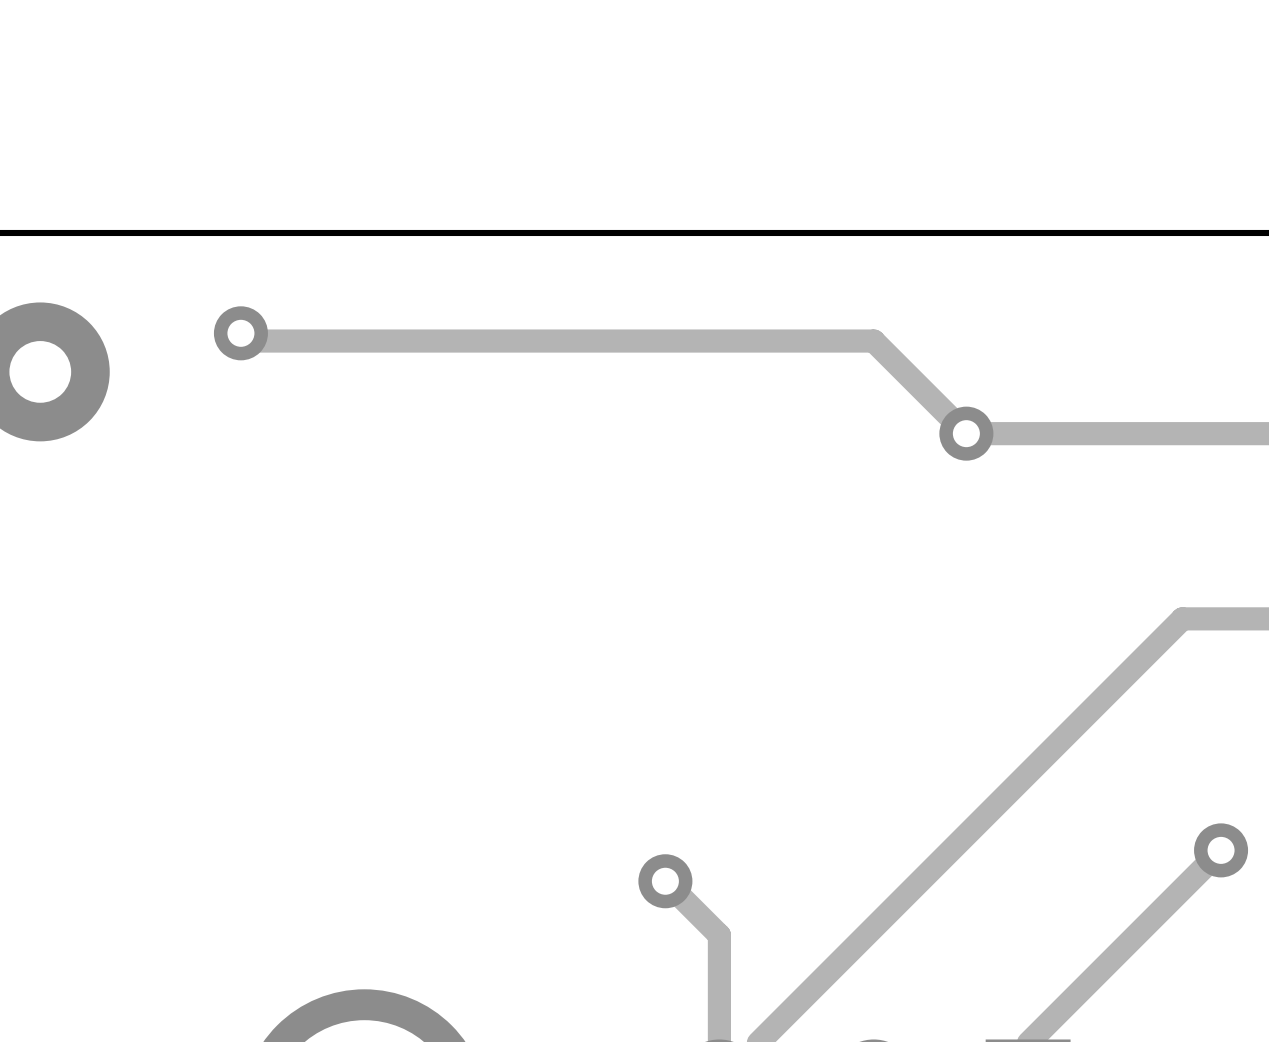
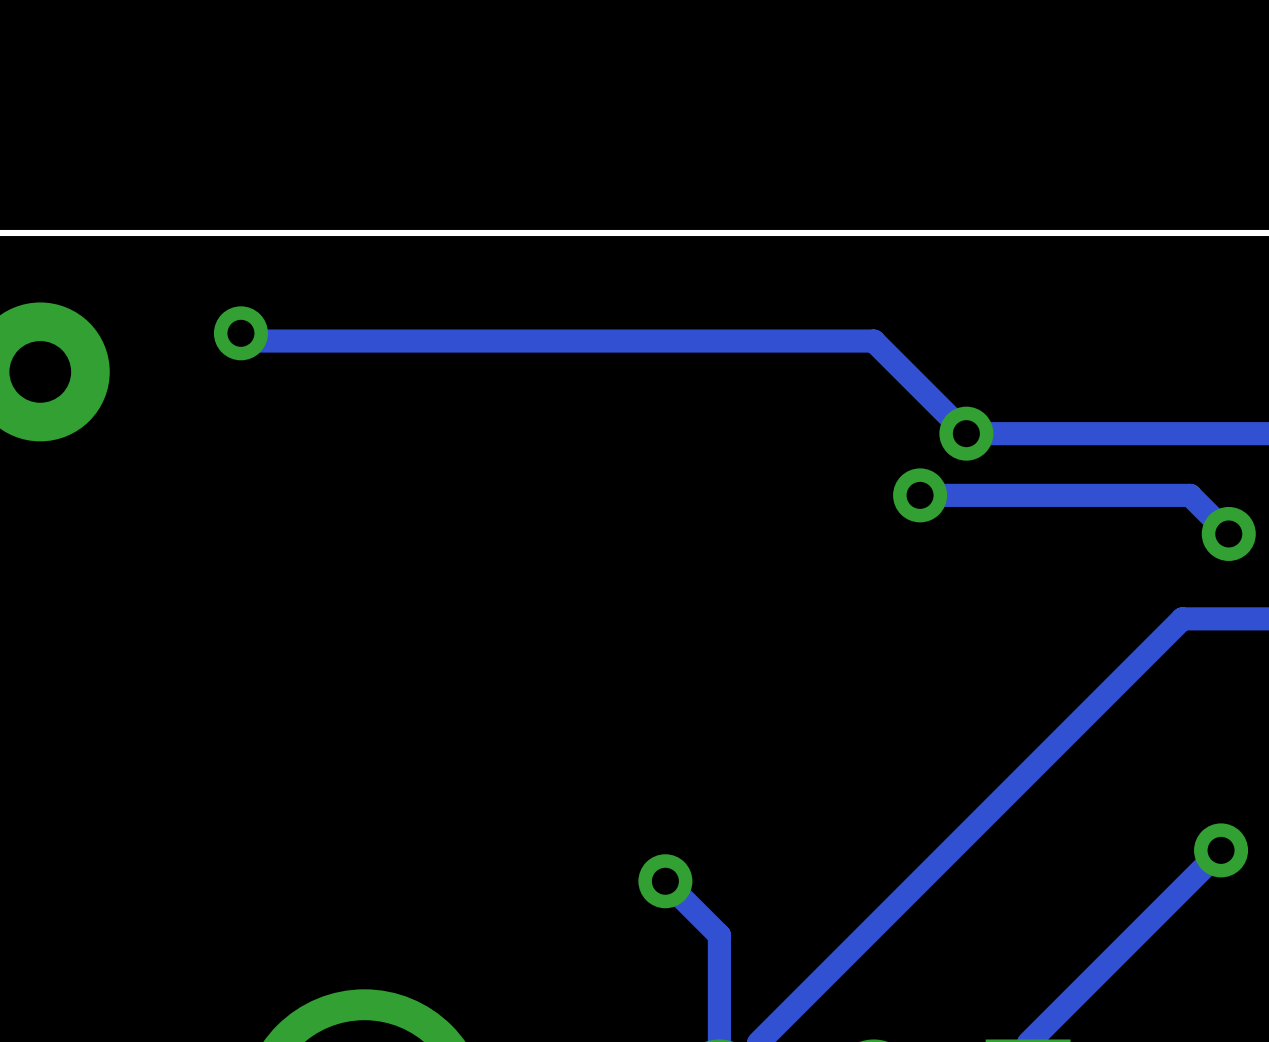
track: none -> (920, 495) (1190, 495) (1228, 533)
via: none -> (920, 495)
via: none -> (1228, 533)

